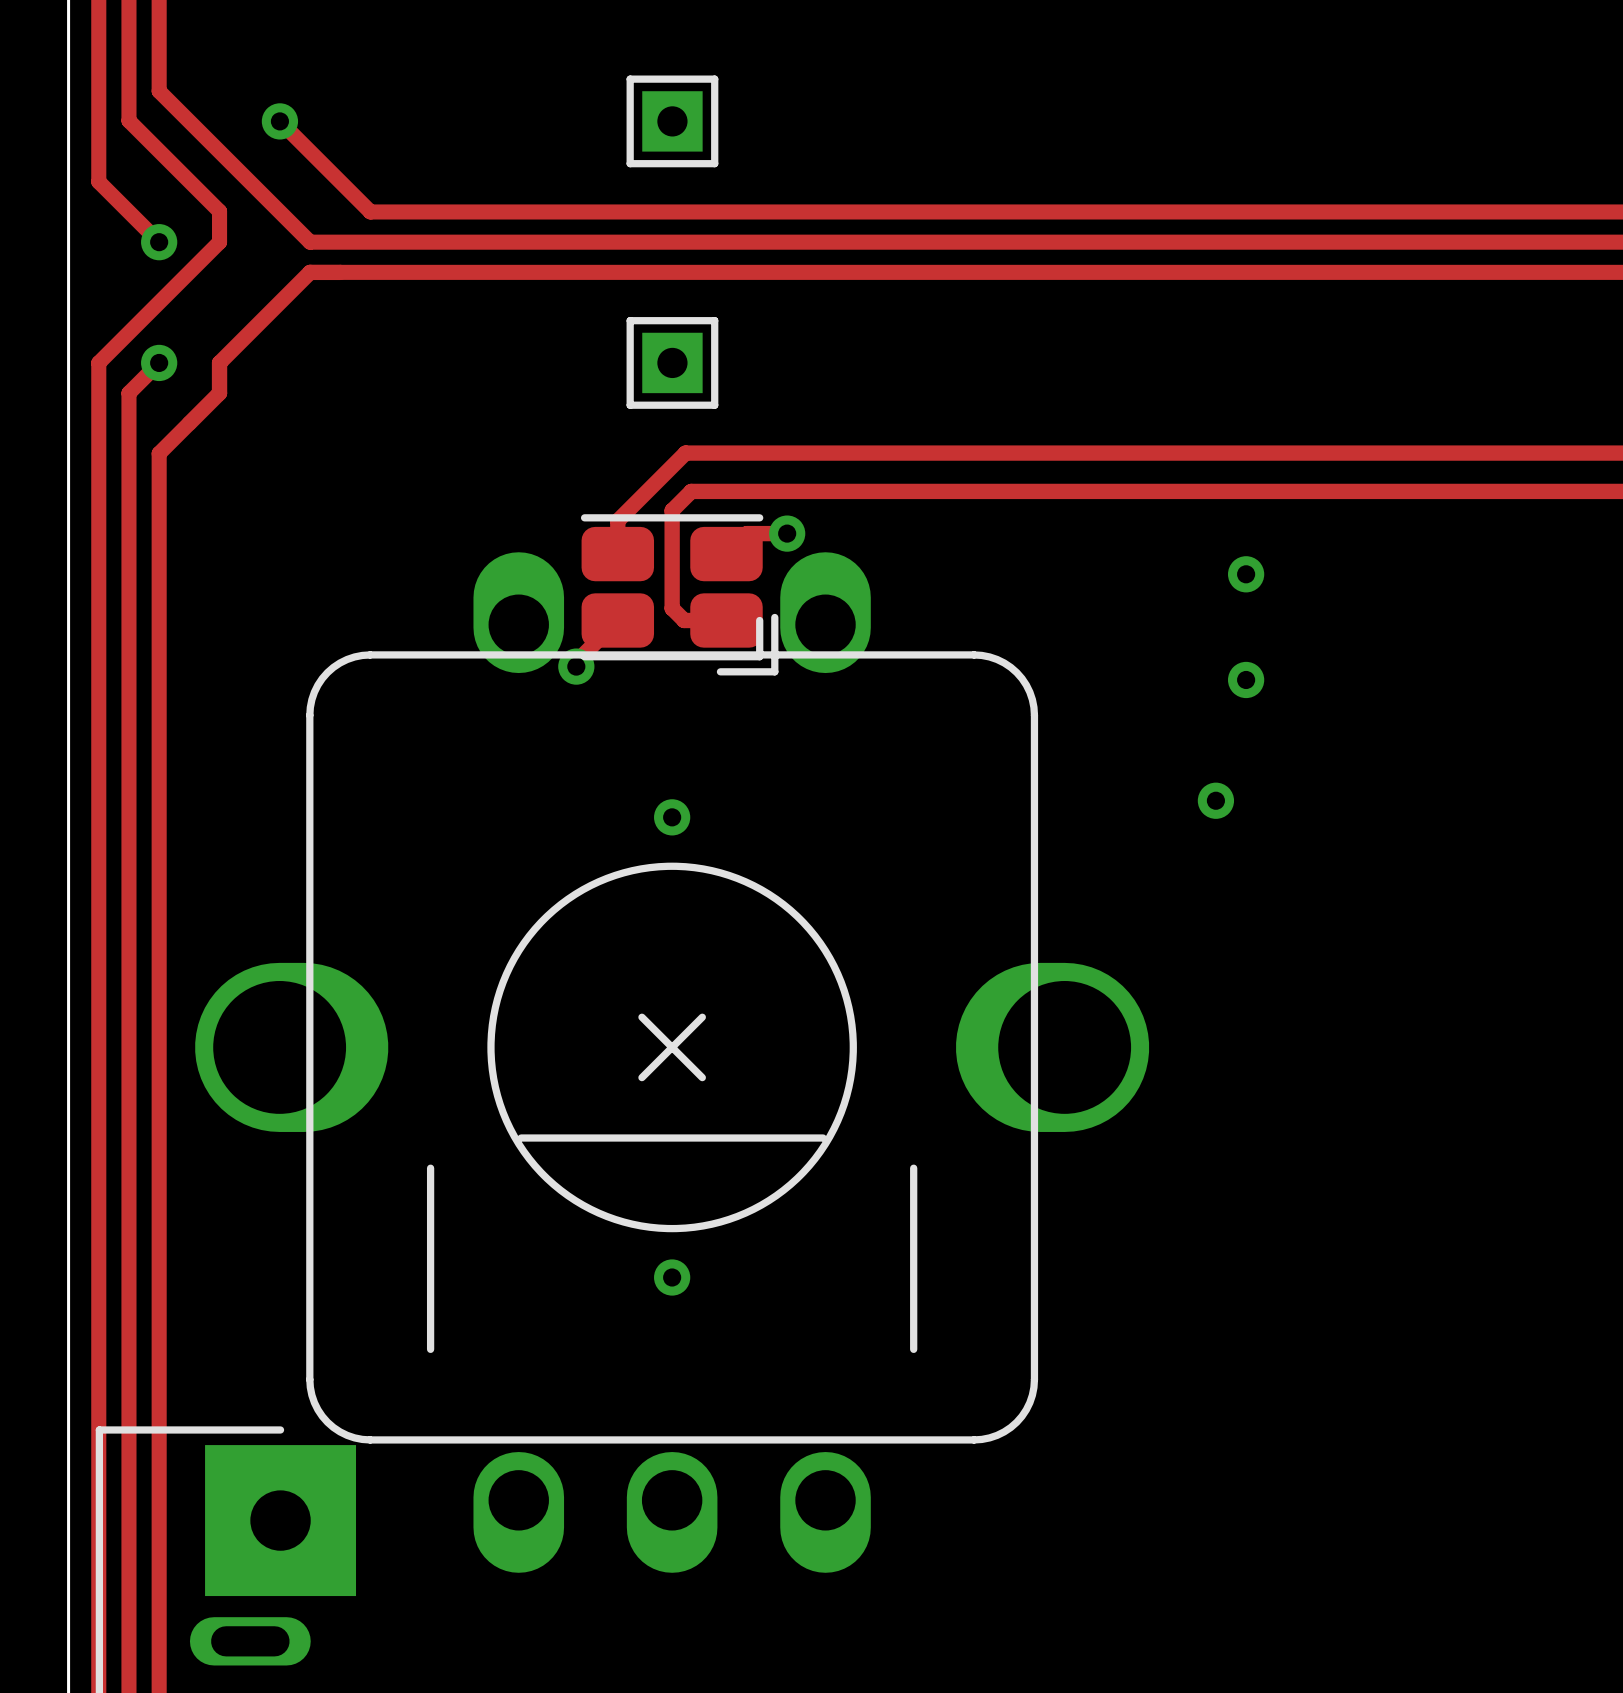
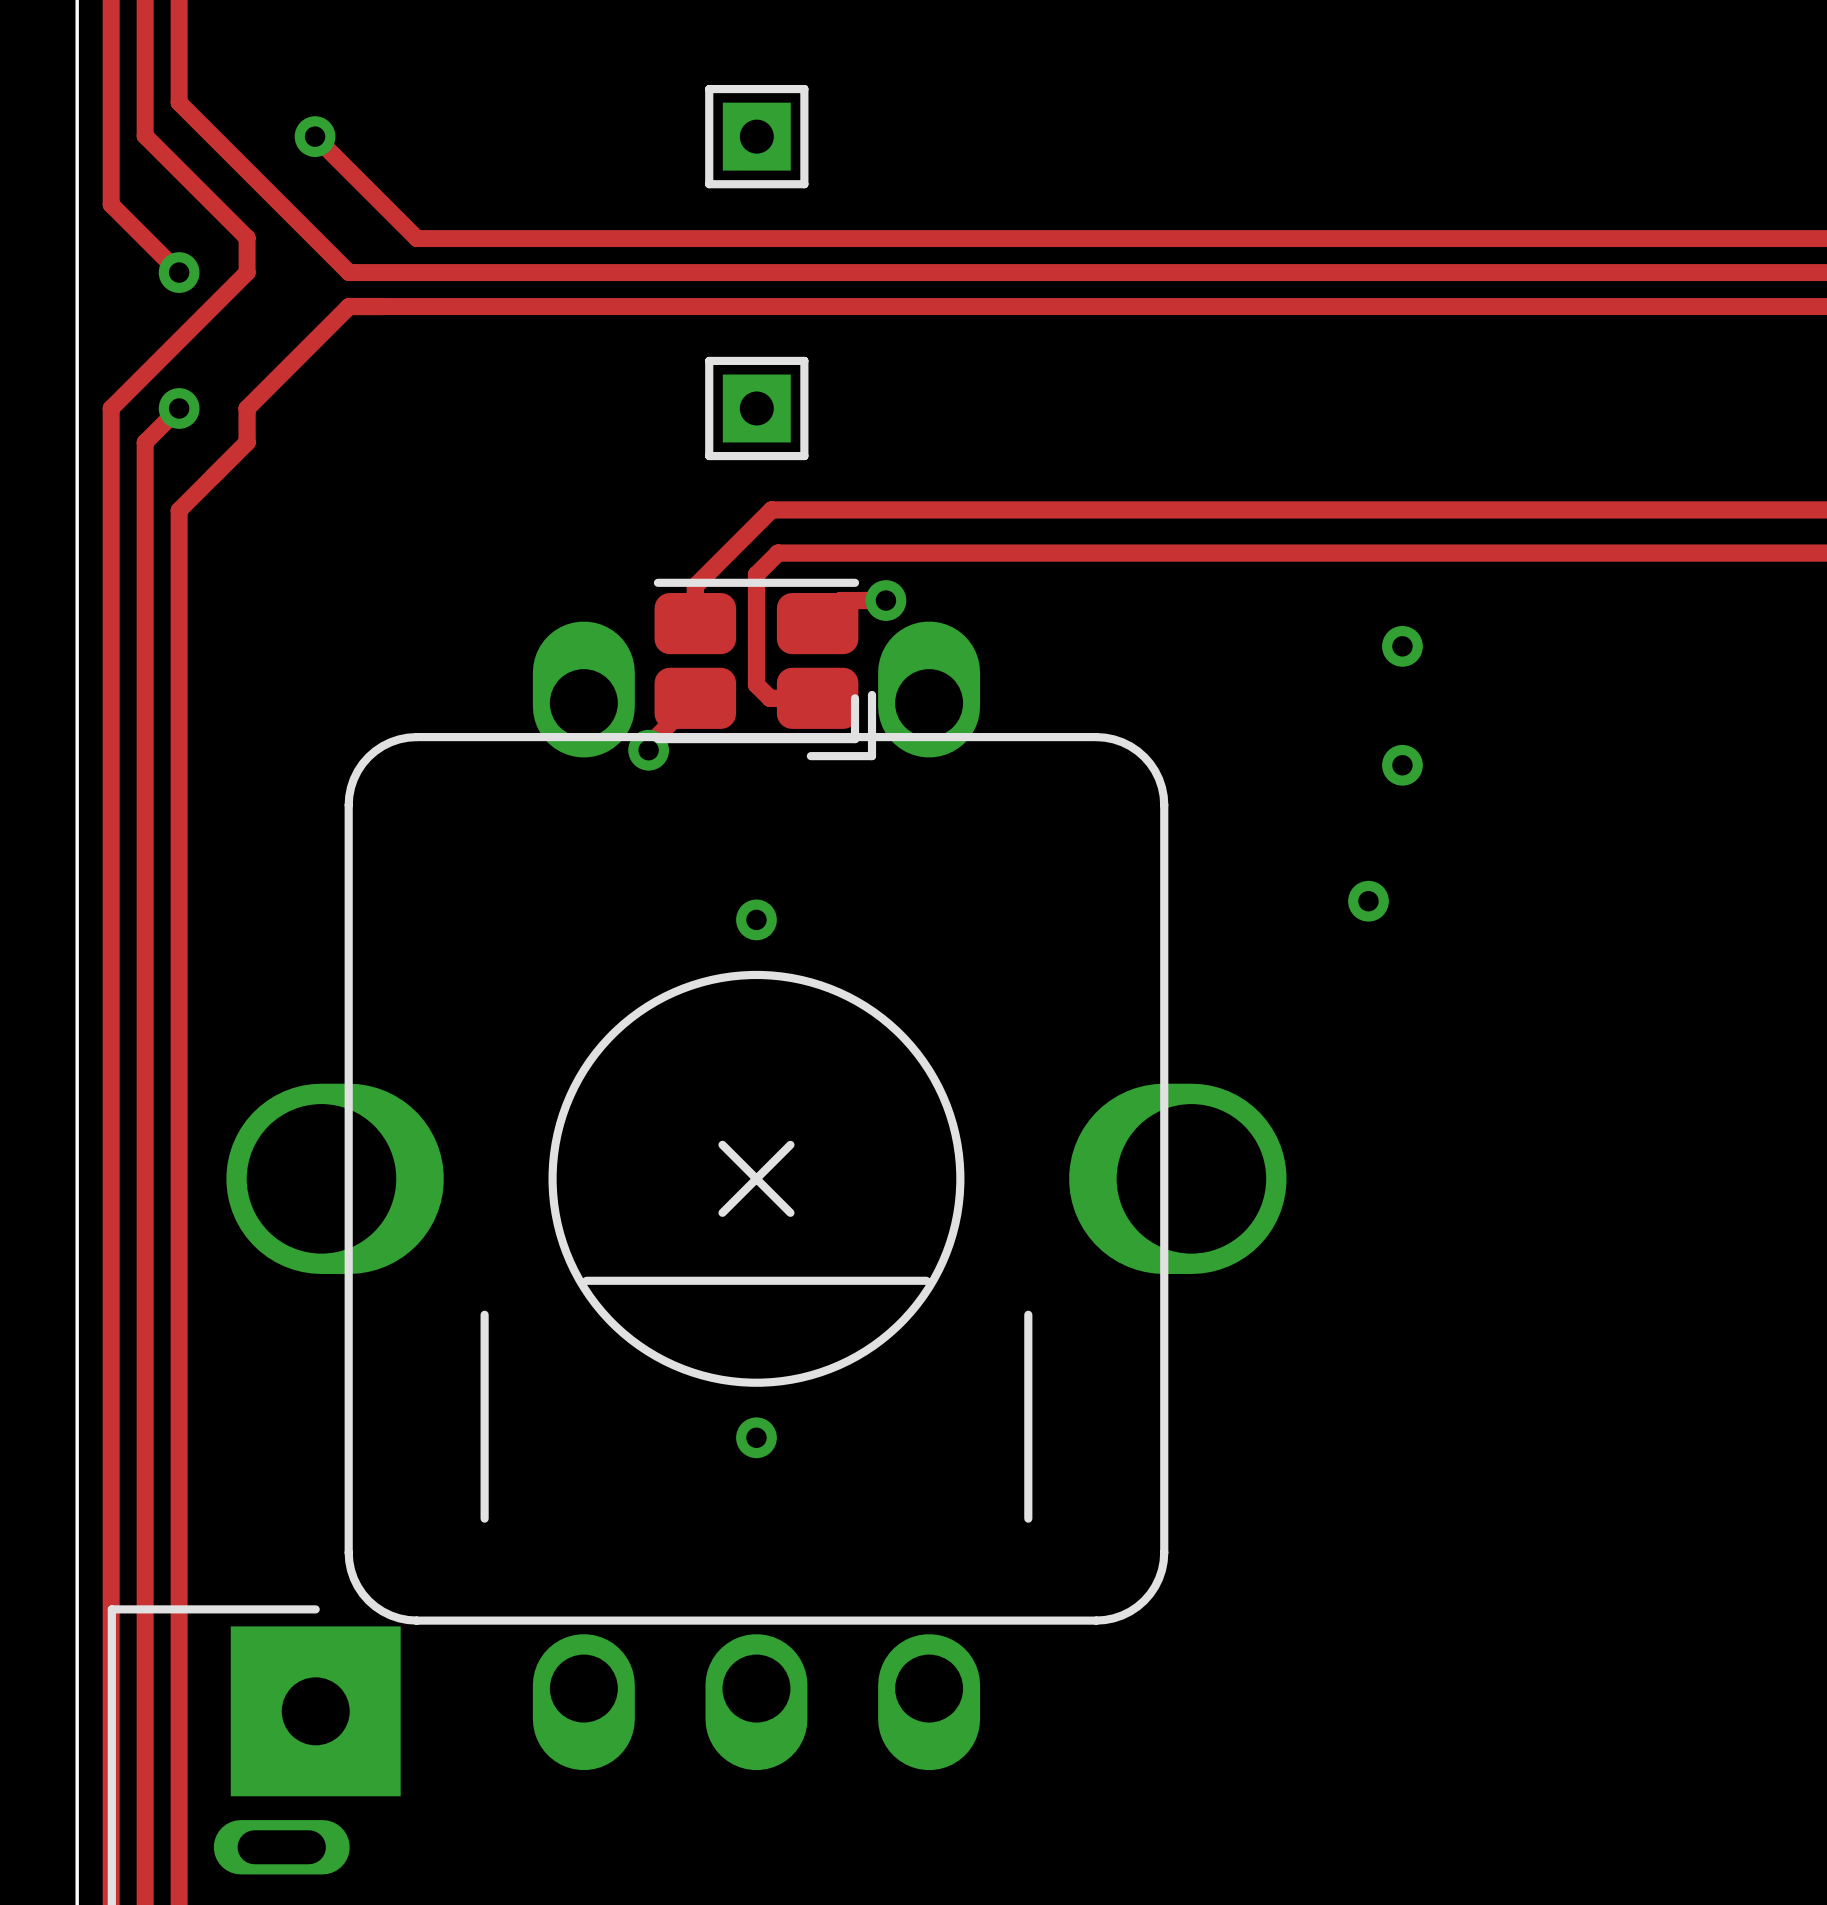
part footprint: [195, 552, 1150, 1573] -> [226, 621, 1287, 1771]

